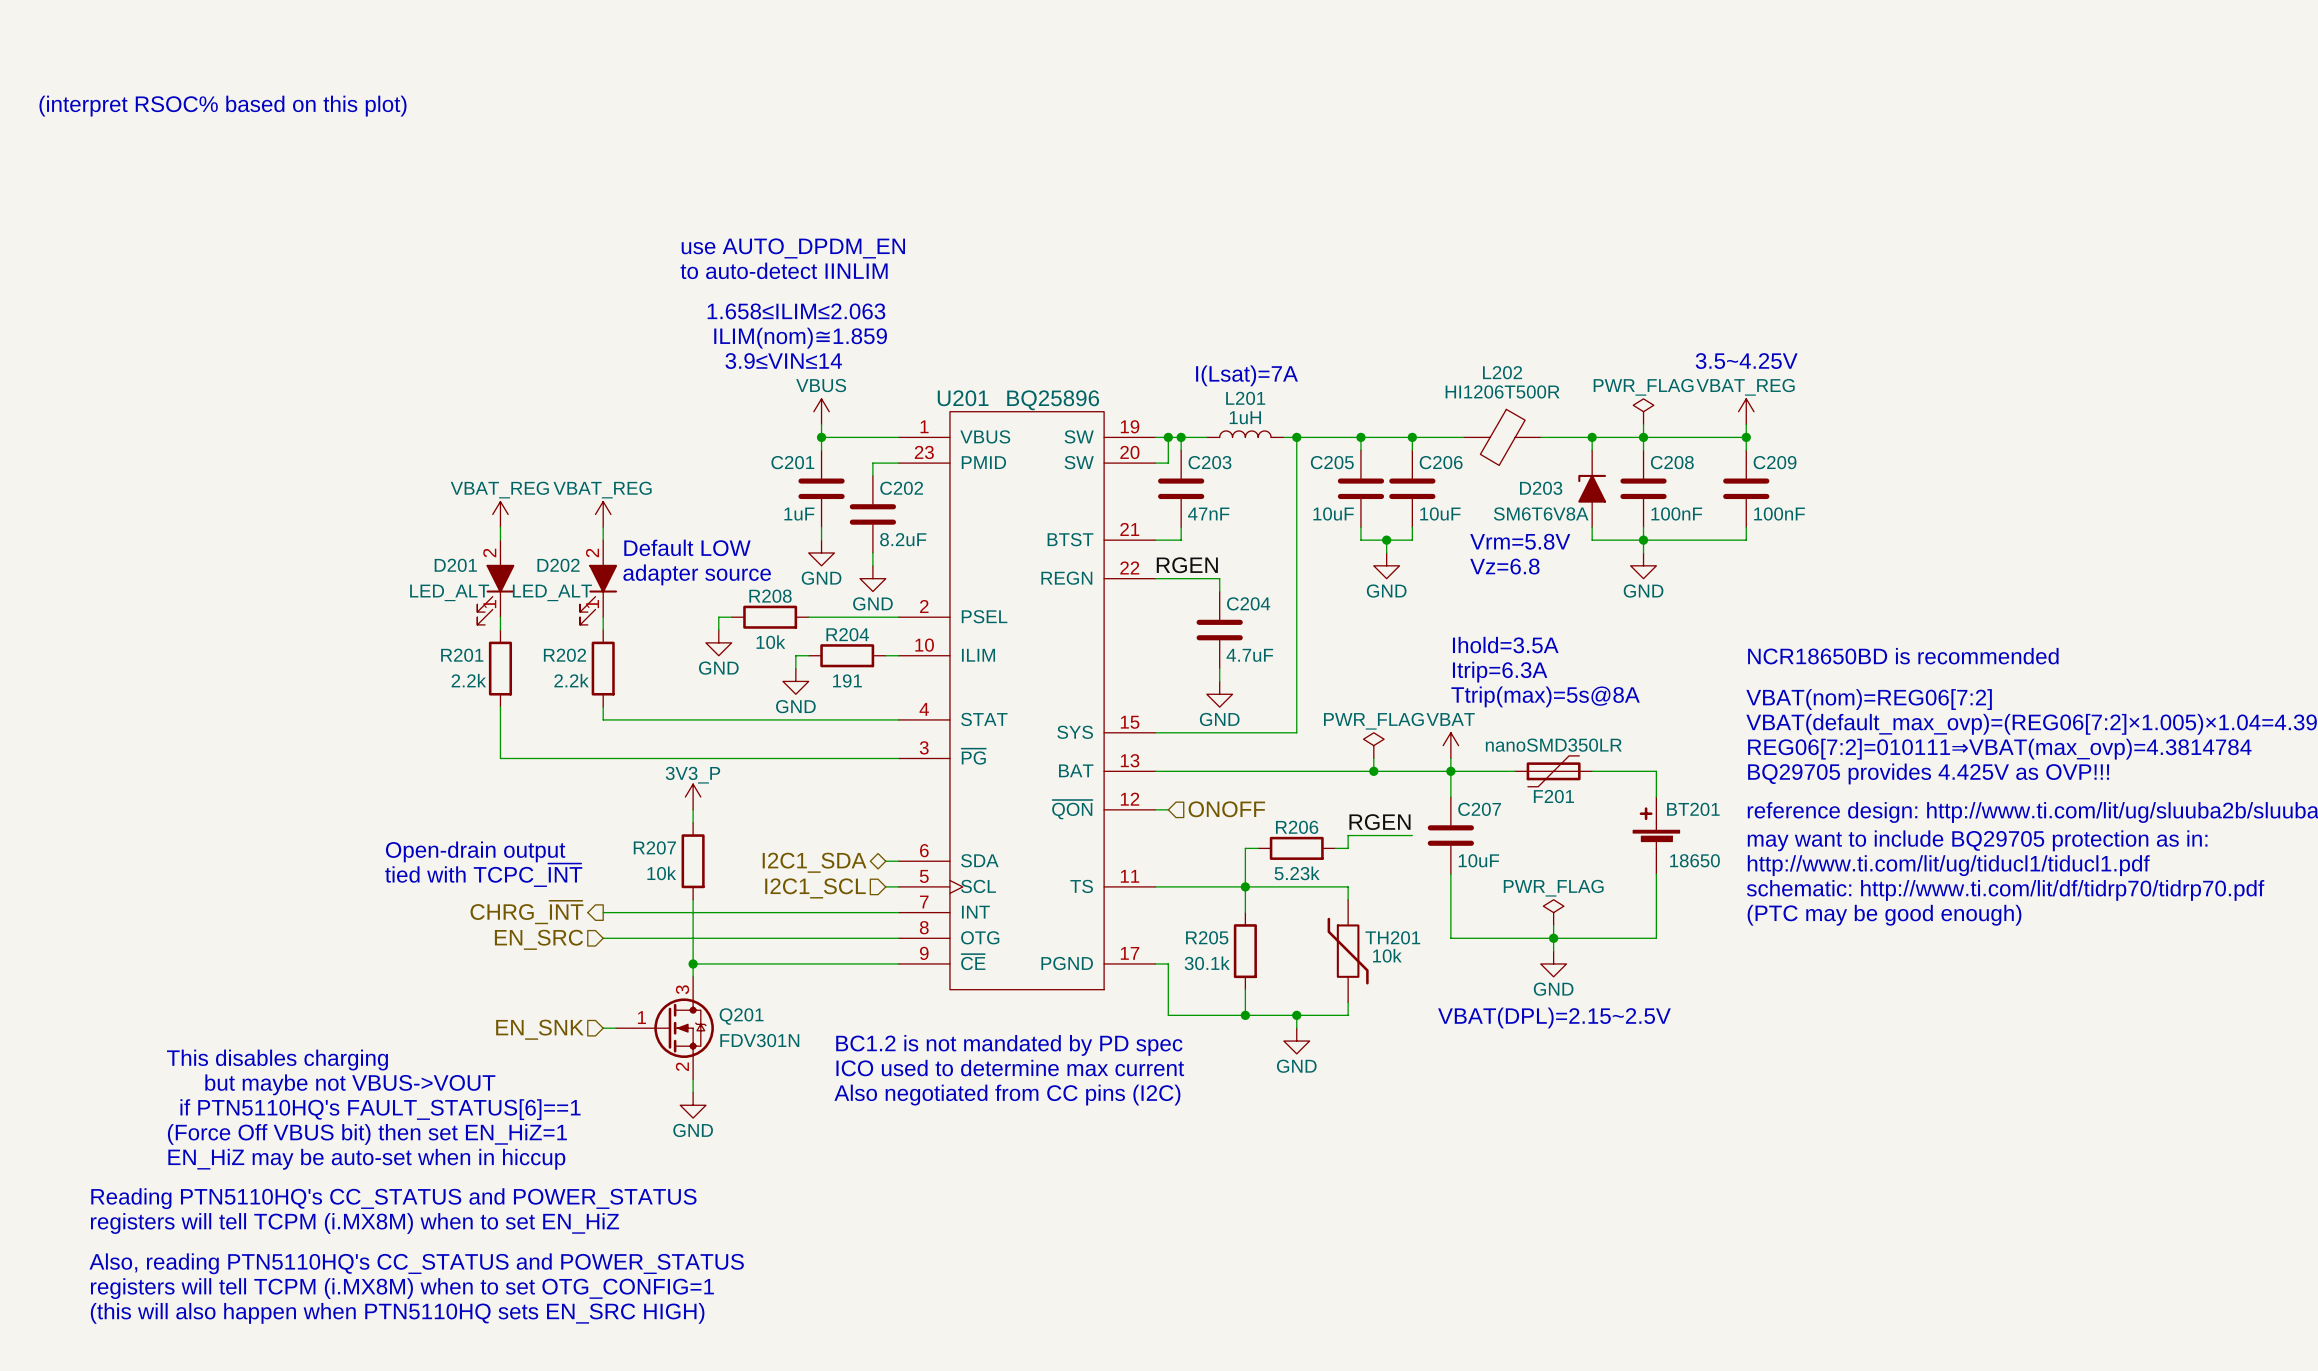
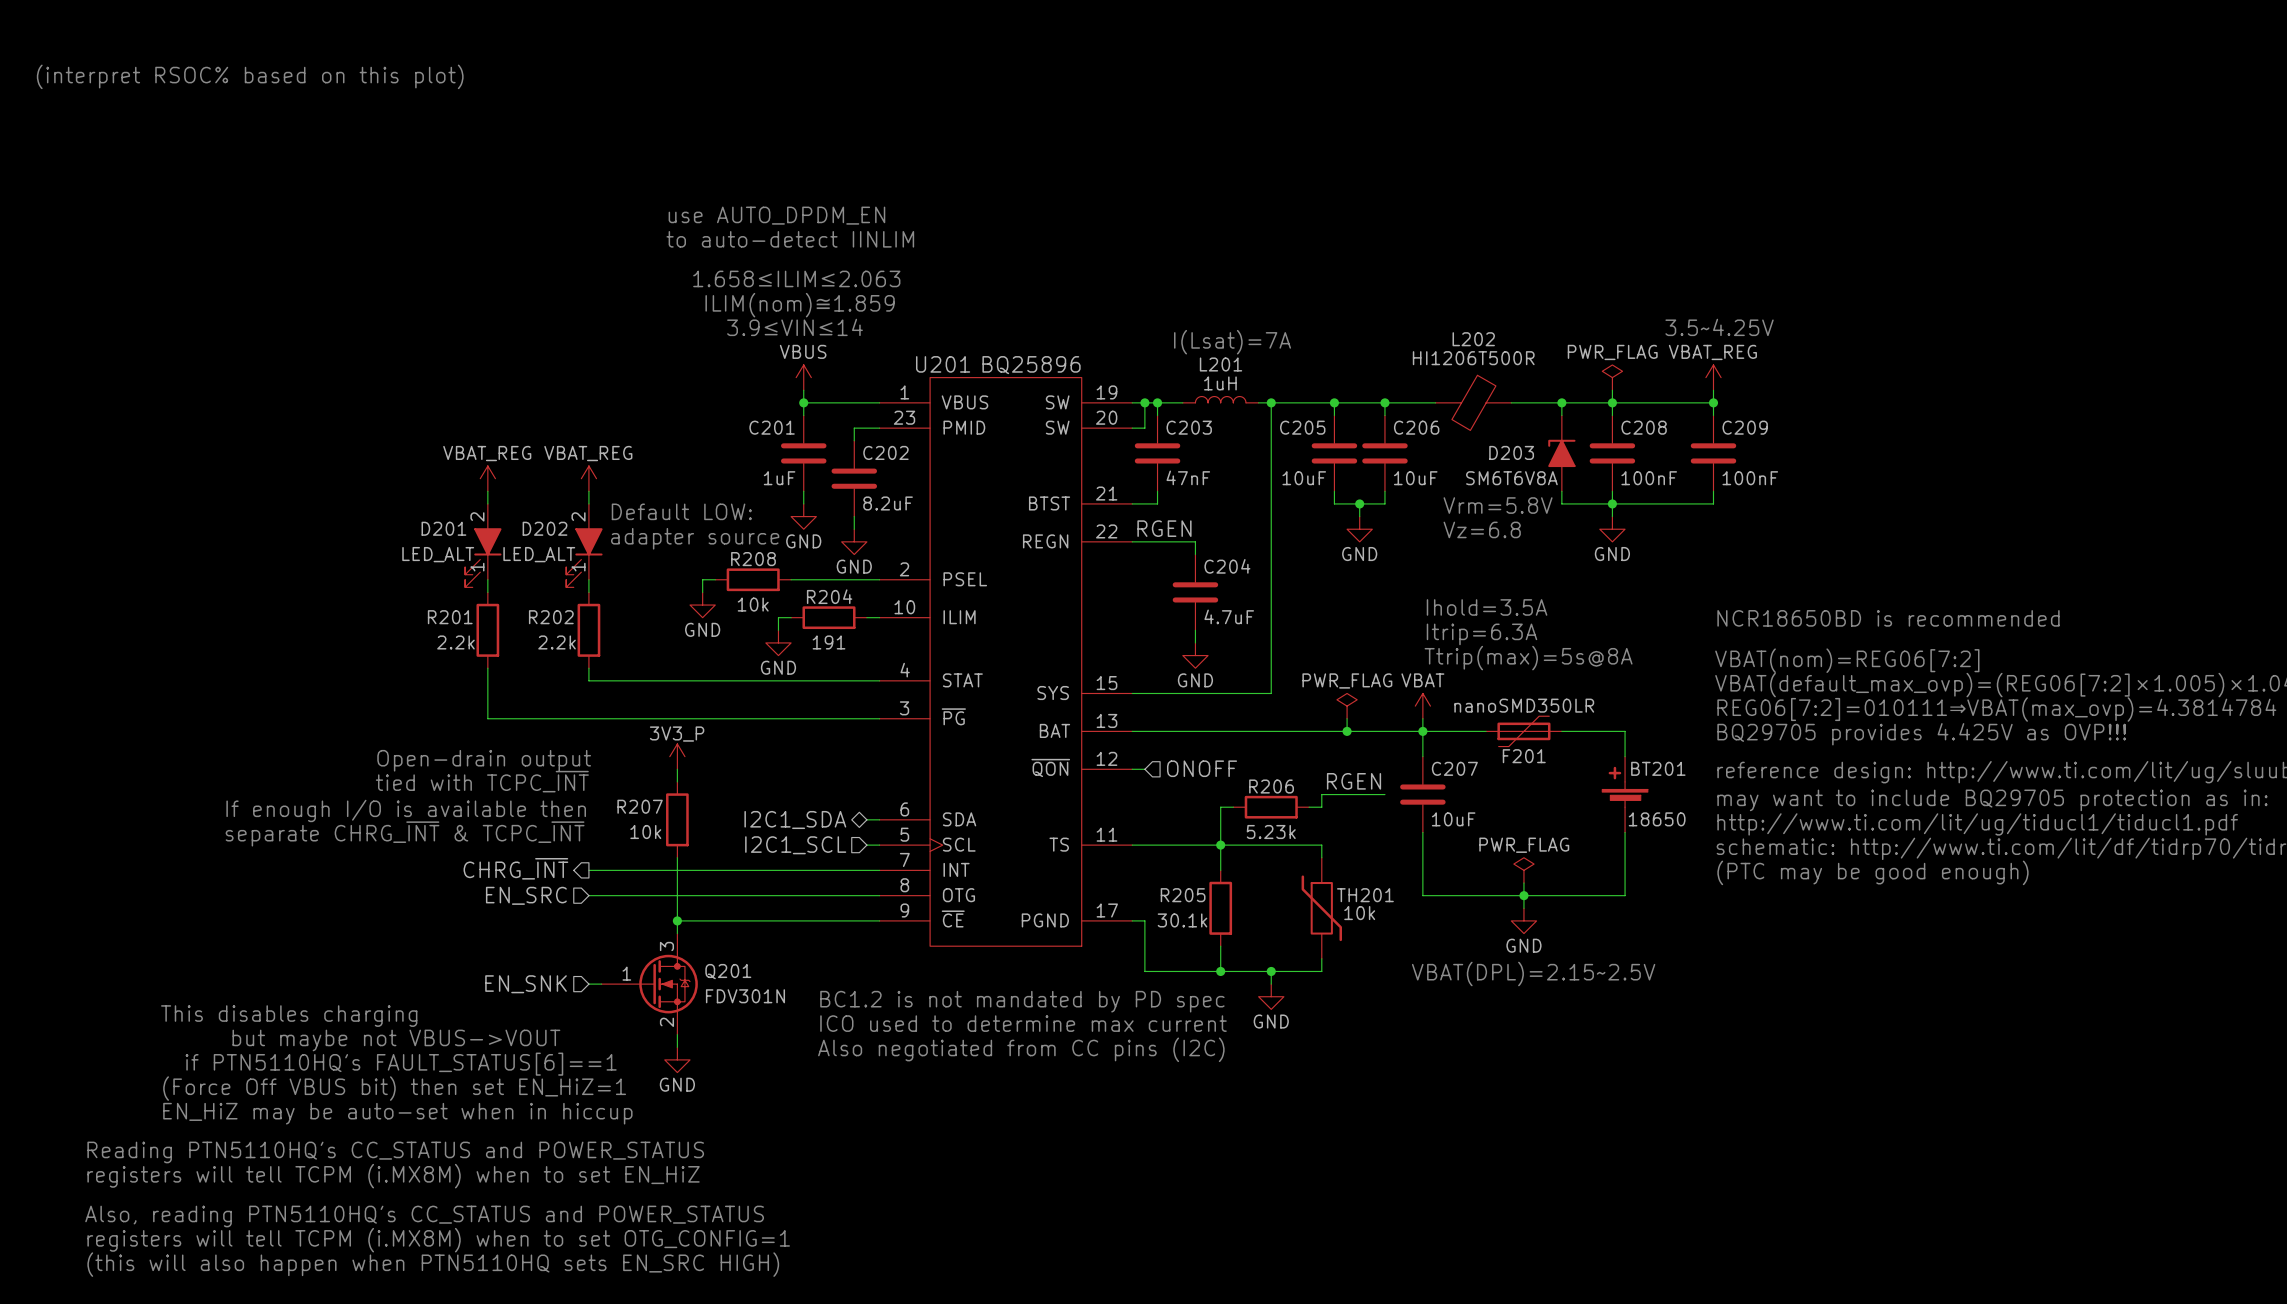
text: Default LOW (687, 547) -> Default LOW: (681, 511)
text: none -> If enough I/O is available then (406, 810)
text position: Open-drain output (475, 851) -> Open-drain output (484, 760)
text: none -> separate CHRG_~{INT} & TCPC_~{INT} (405, 833)
text position: tied with TCPC_~{INT} (483, 875) -> tied with TCPC_~{INT} (482, 781)

